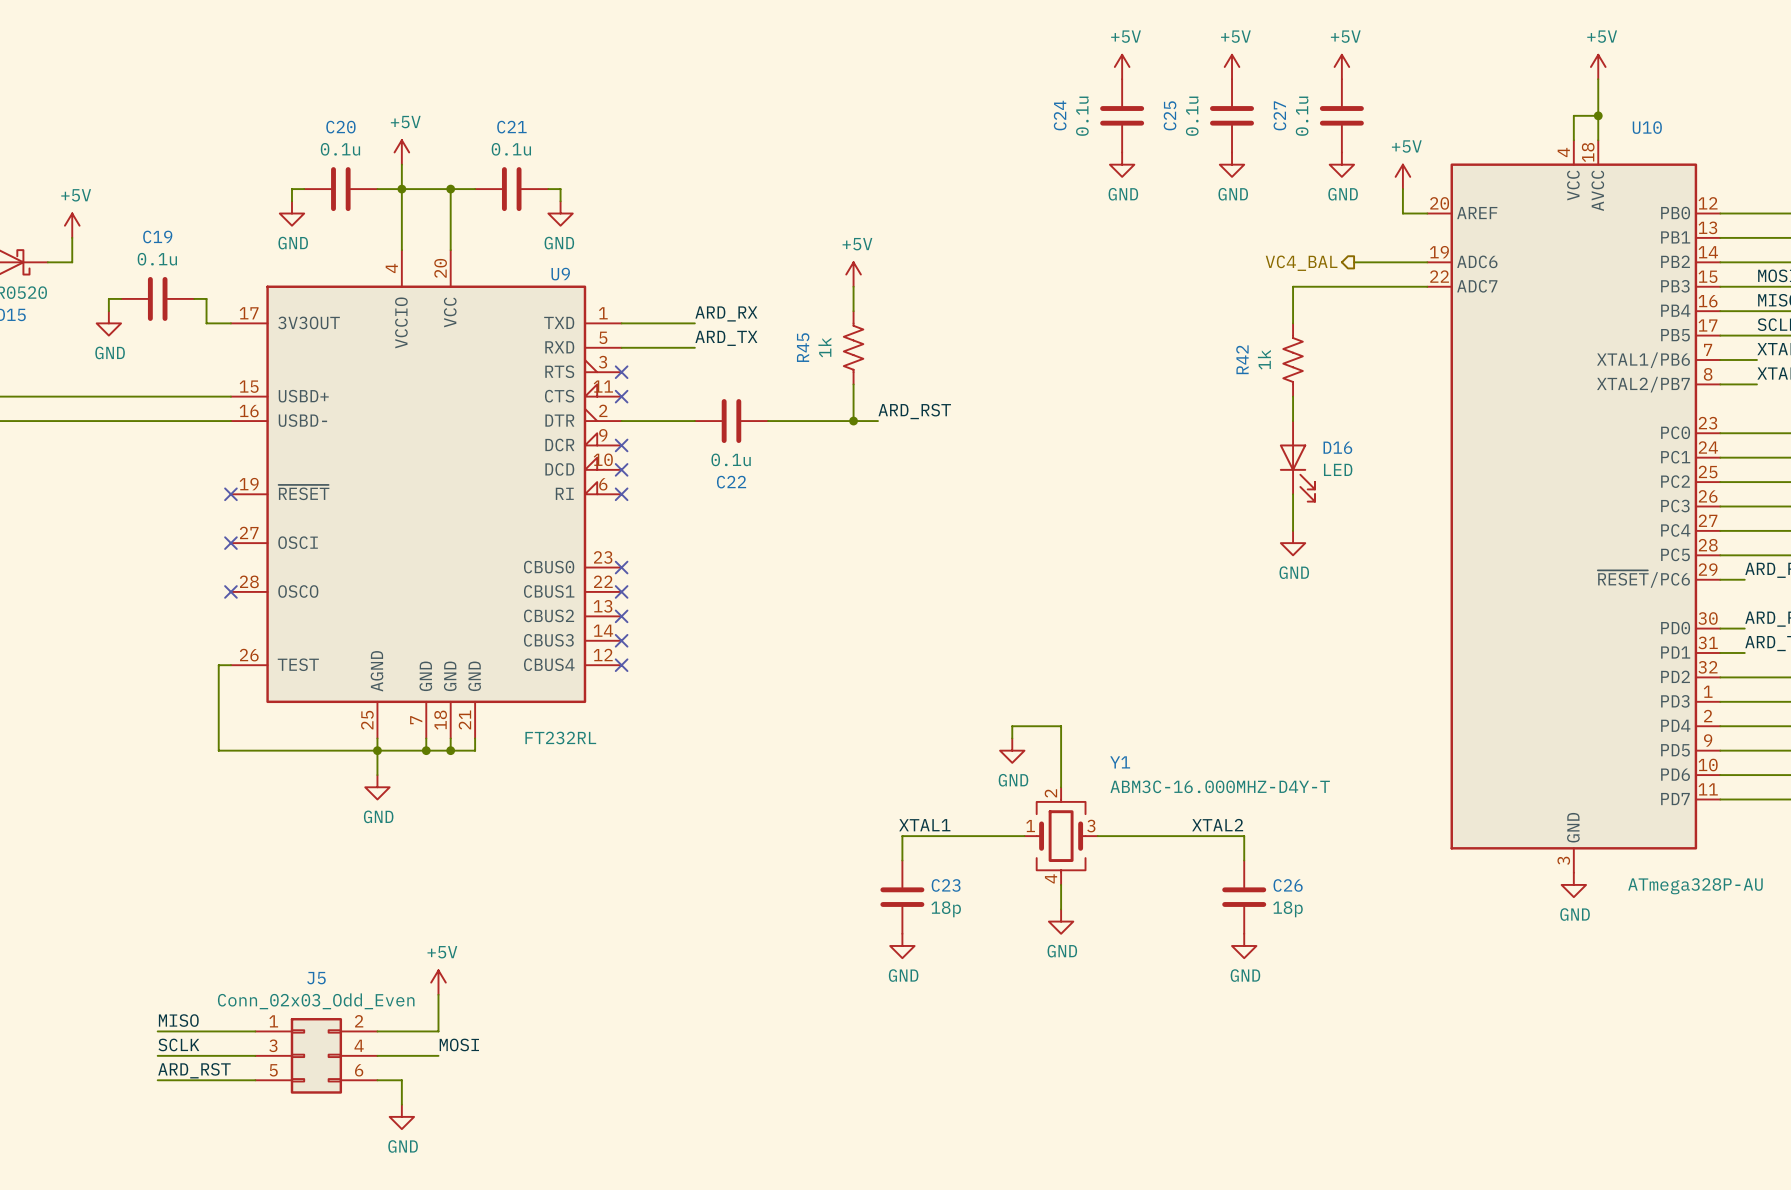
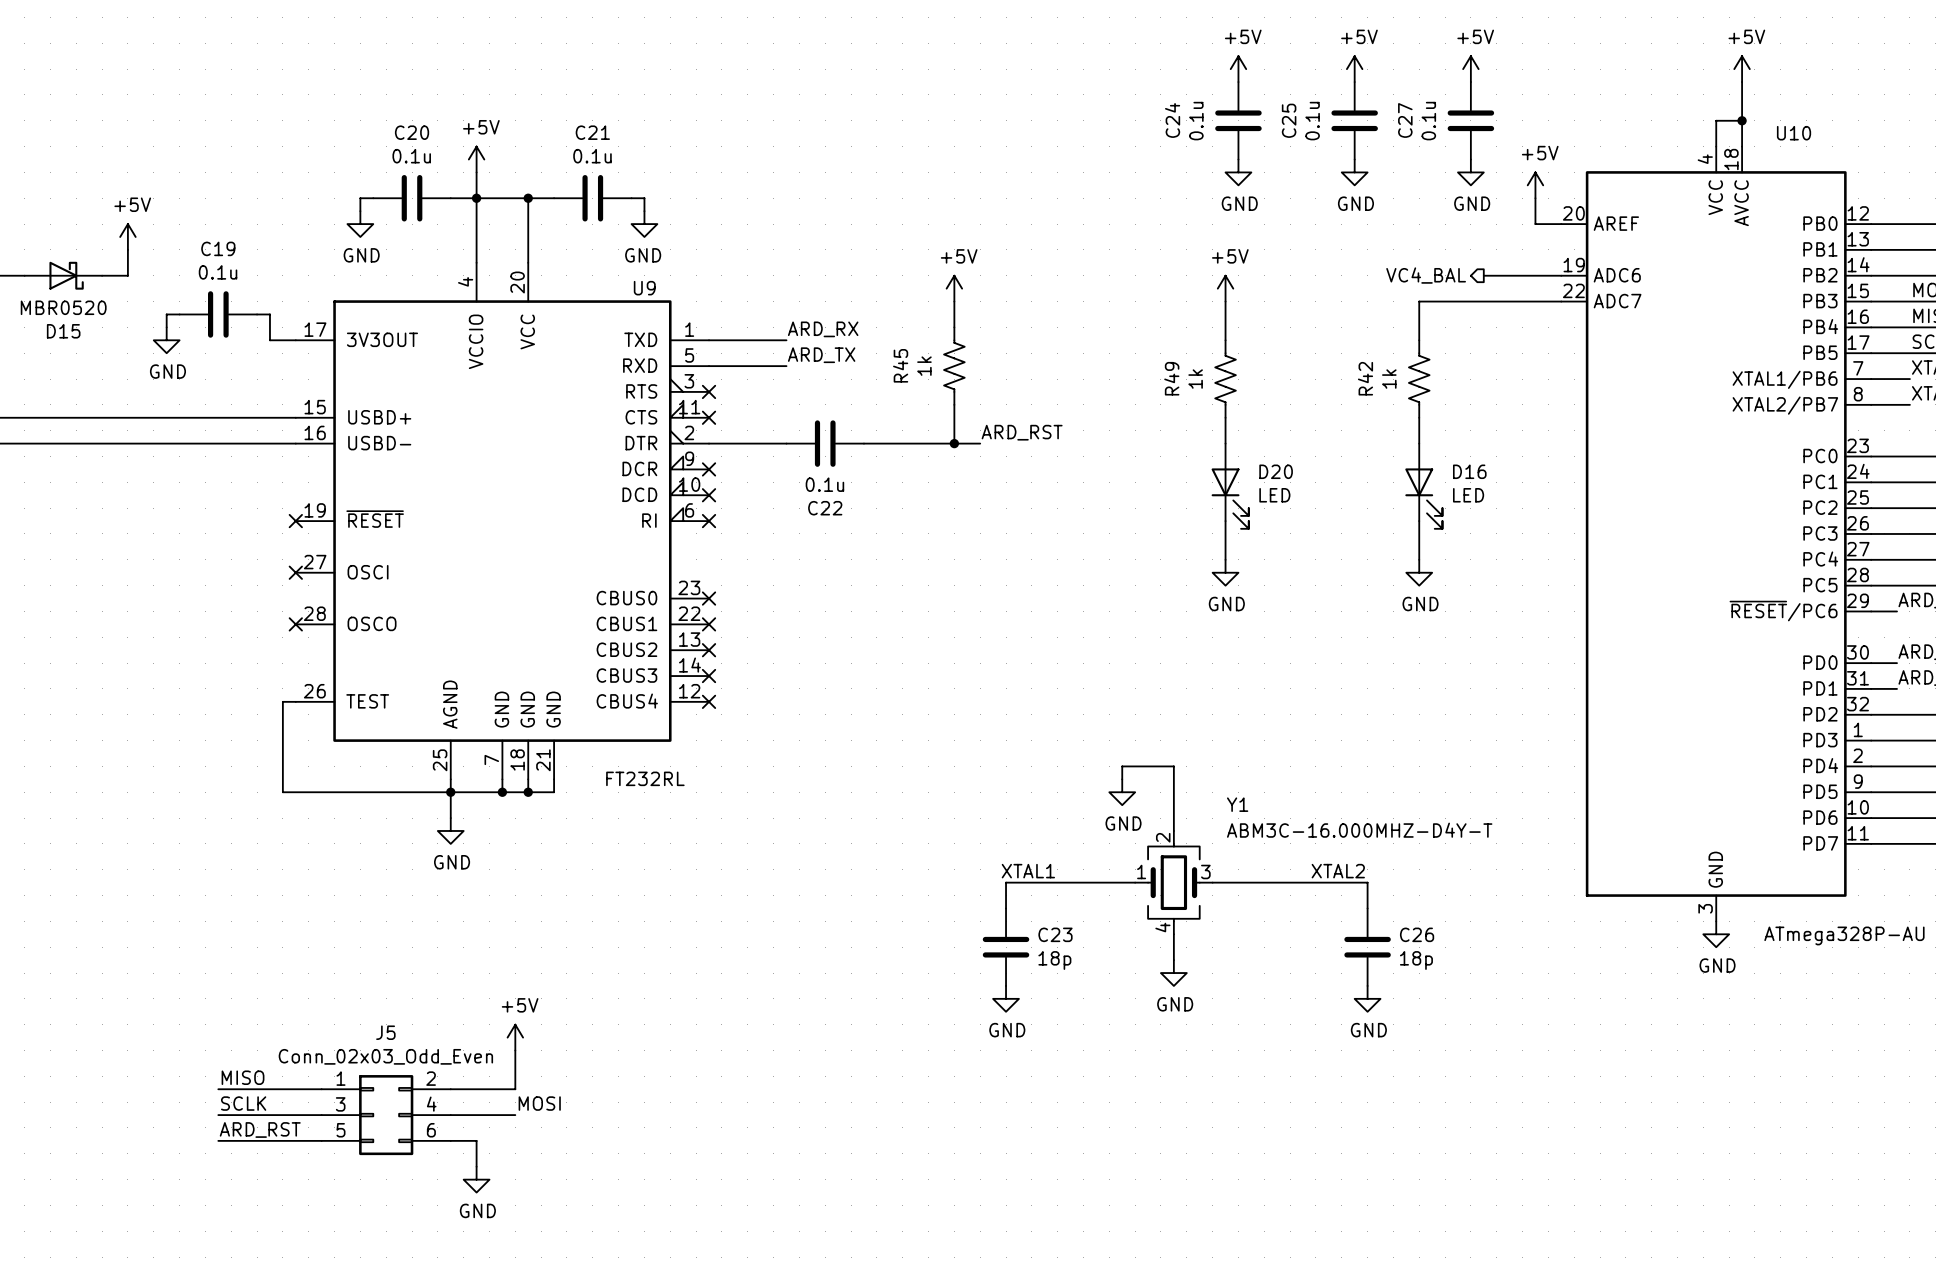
power symbol: none -> +5V (1225, 288)
wire: none -> (1225, 301) (1225, 340)
R49: none -> 1k (1225, 379)
wire: none -> (1225, 417) (1225, 443)
D20: none -> LED (1230, 486)
wire: none -> (1225, 521) (1225, 559)
power symbol: none -> GND (1225, 572)

